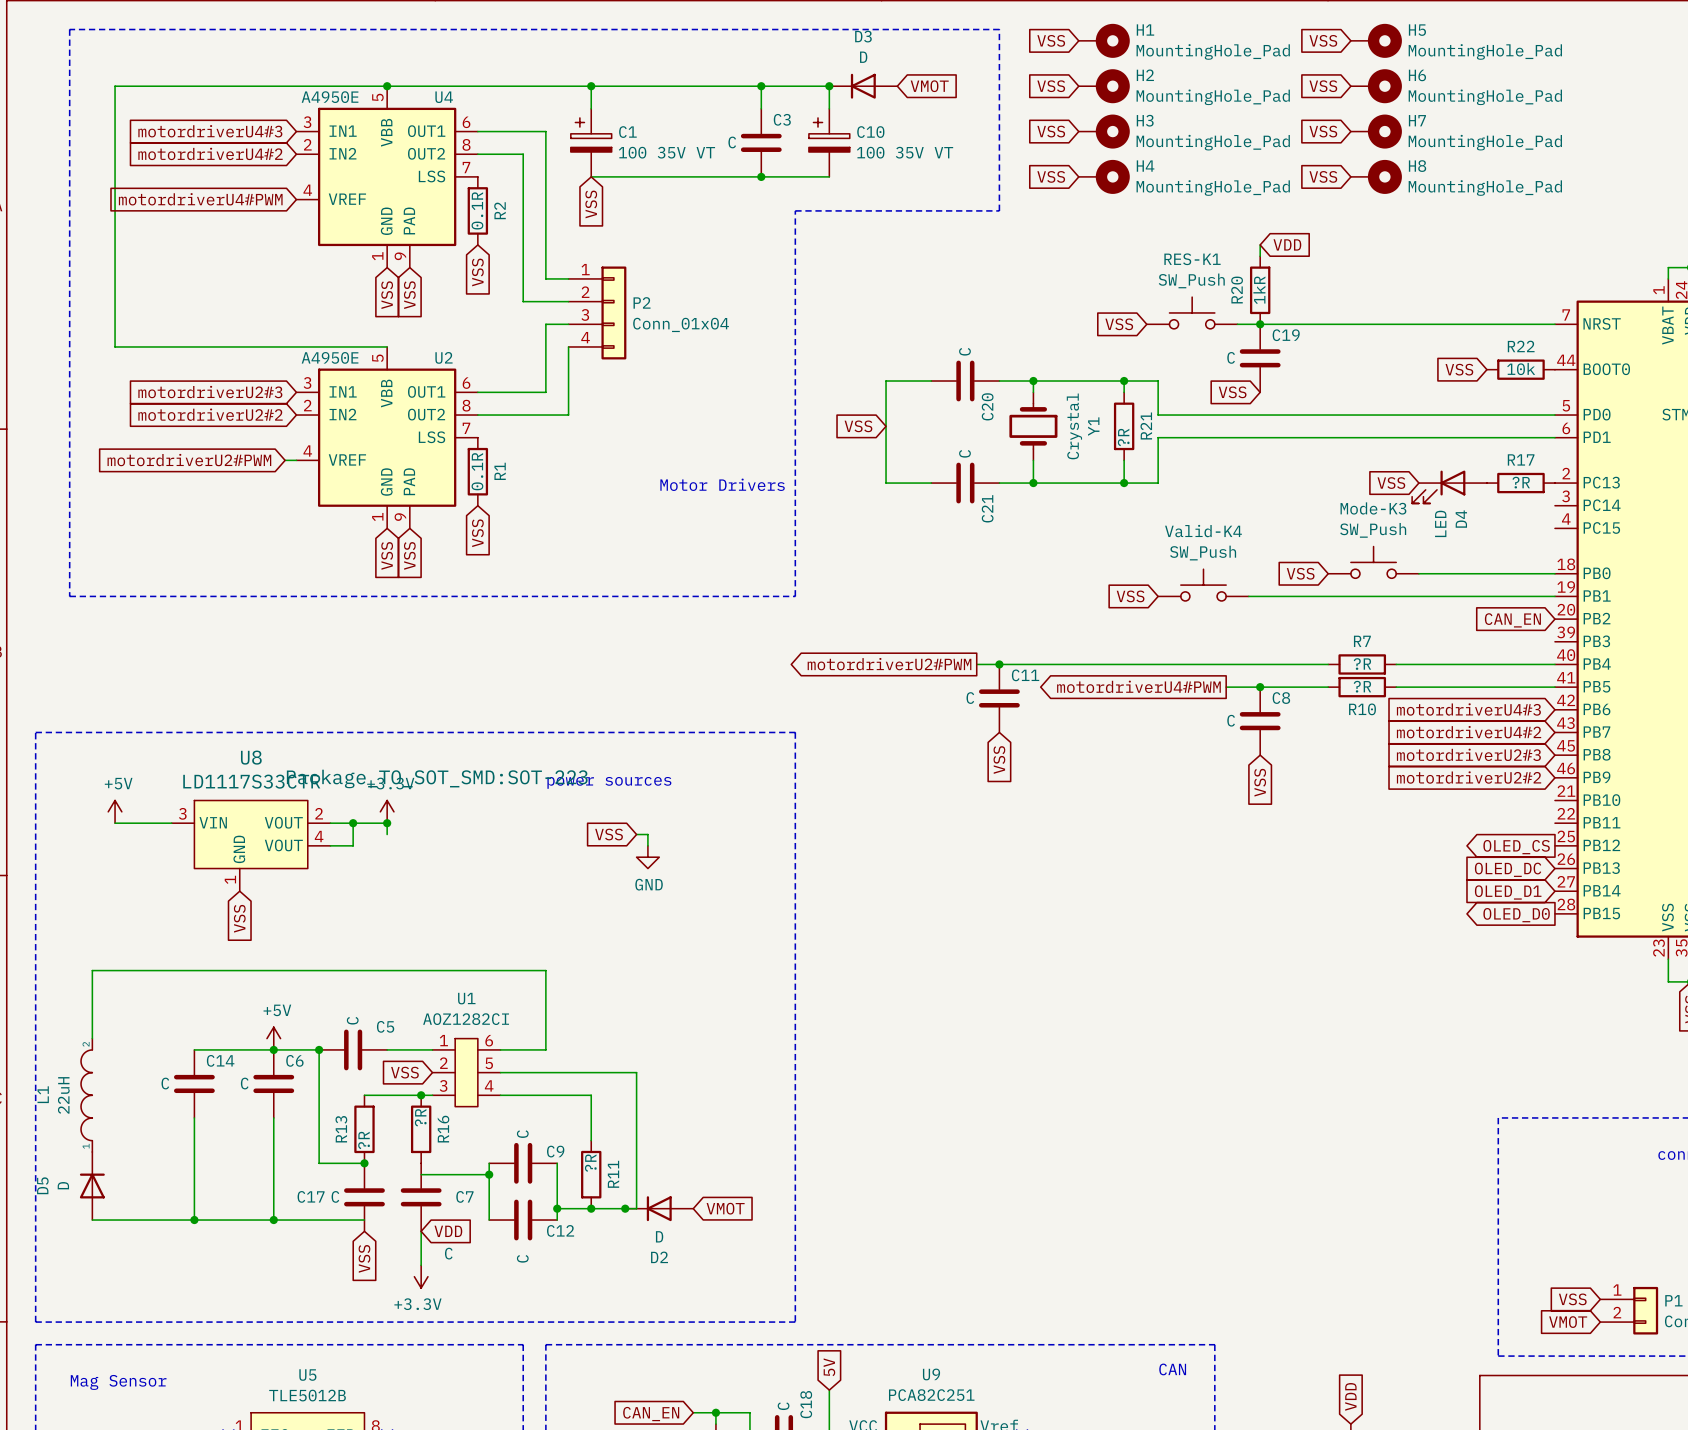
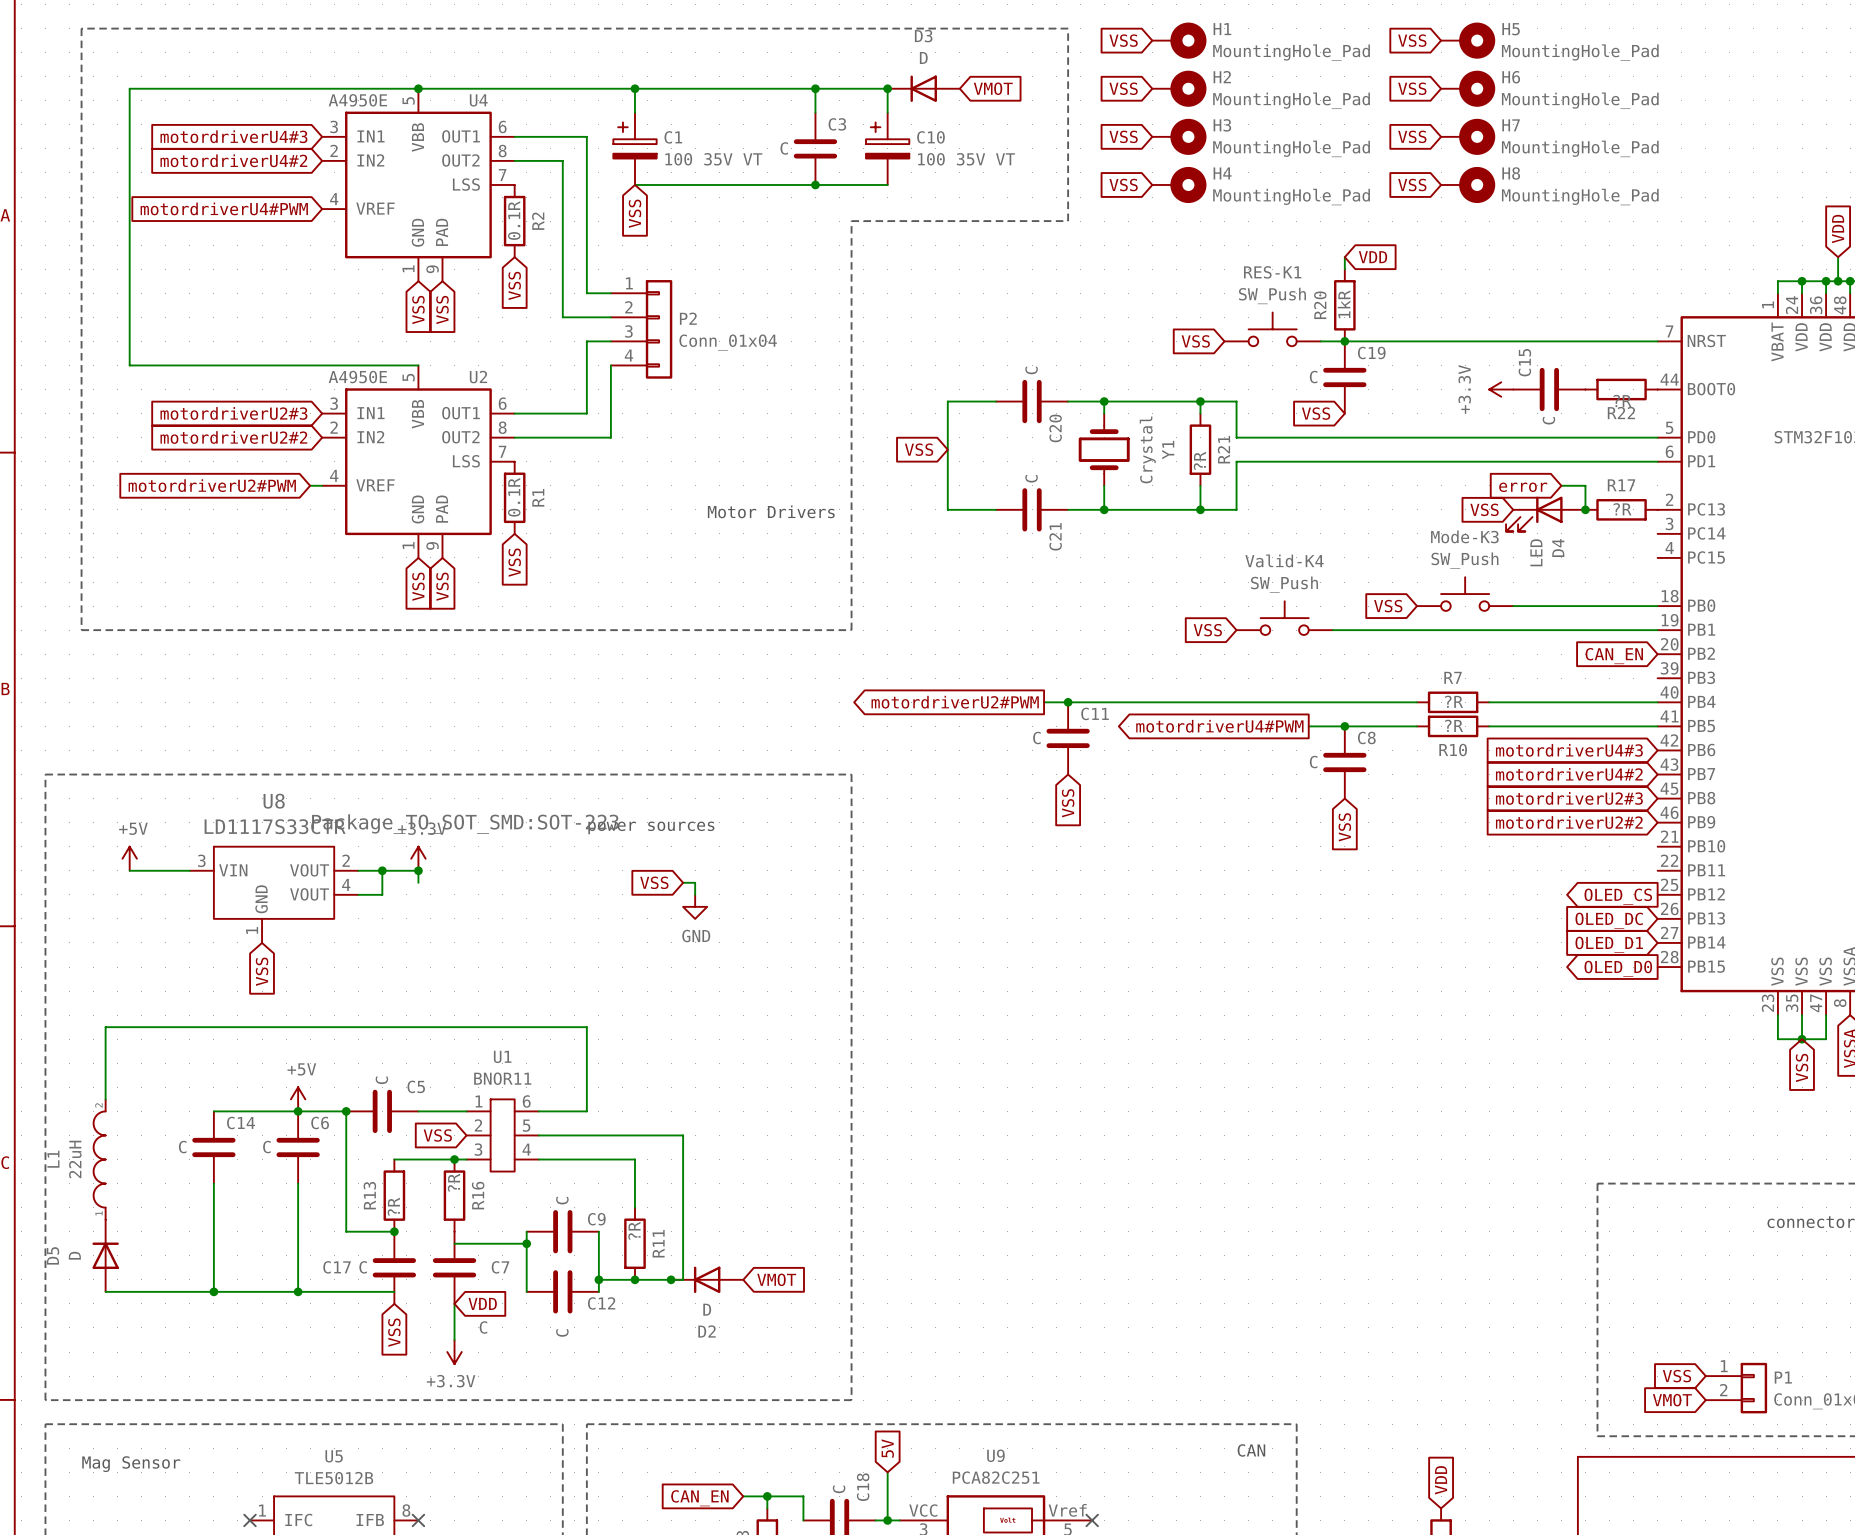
R22 name position: R22 (1521, 346) -> R22 (1621, 413)
R22 value: 10k (1521, 368) -> ?R (1622, 400)
power symbol: none -> +3.3V (1501, 389)
C15: none -> C (1549, 389)
global label: VSS (1459, 369) -> none
wire: none -> (1561, 485) (1585, 485) (1585, 509)
global label: none -> error (1523, 487)
junction: none -> (1585, 509)
U1 value: AOZ1282CI (466, 1019) -> BNOR11 (502, 1078)

